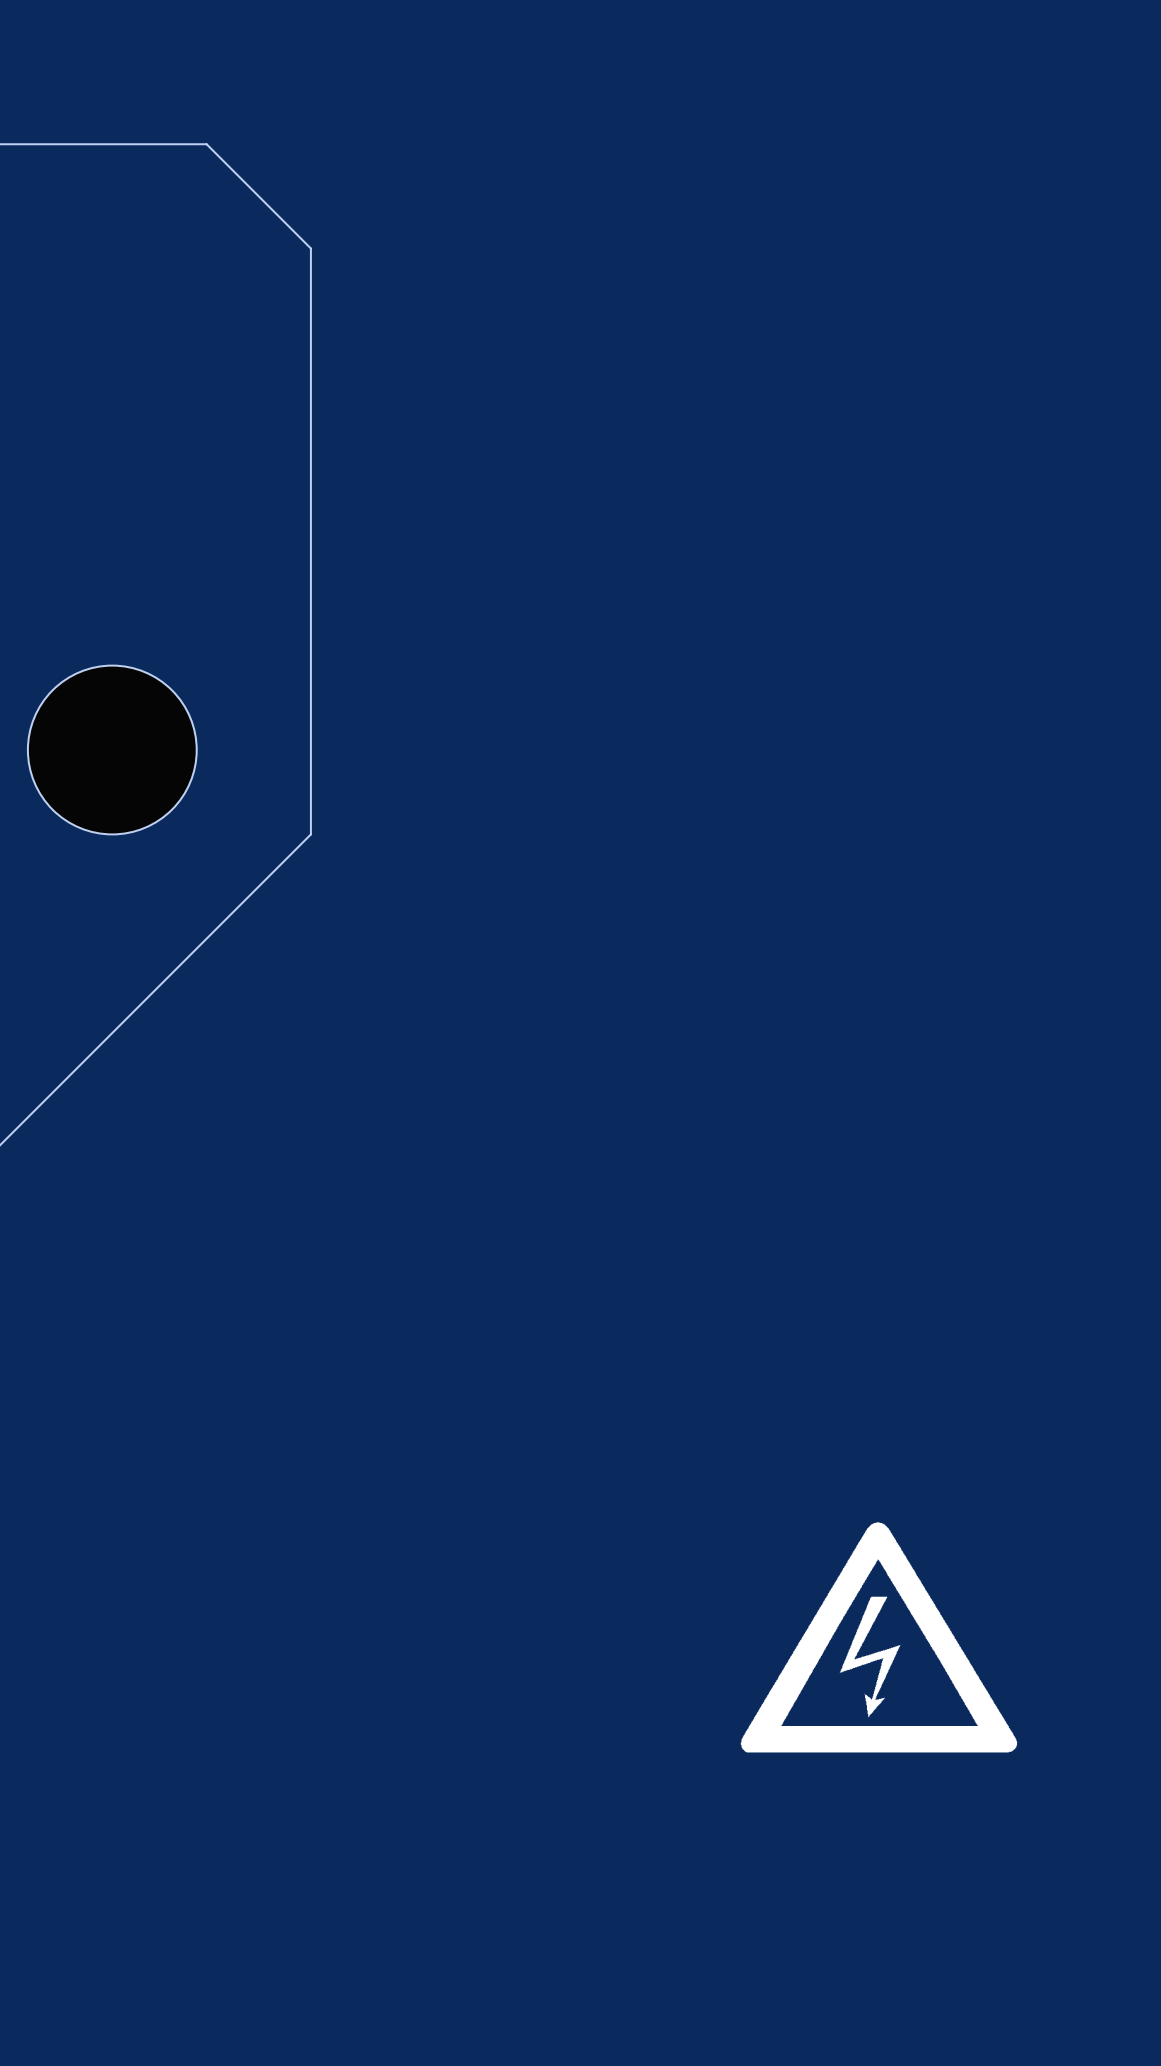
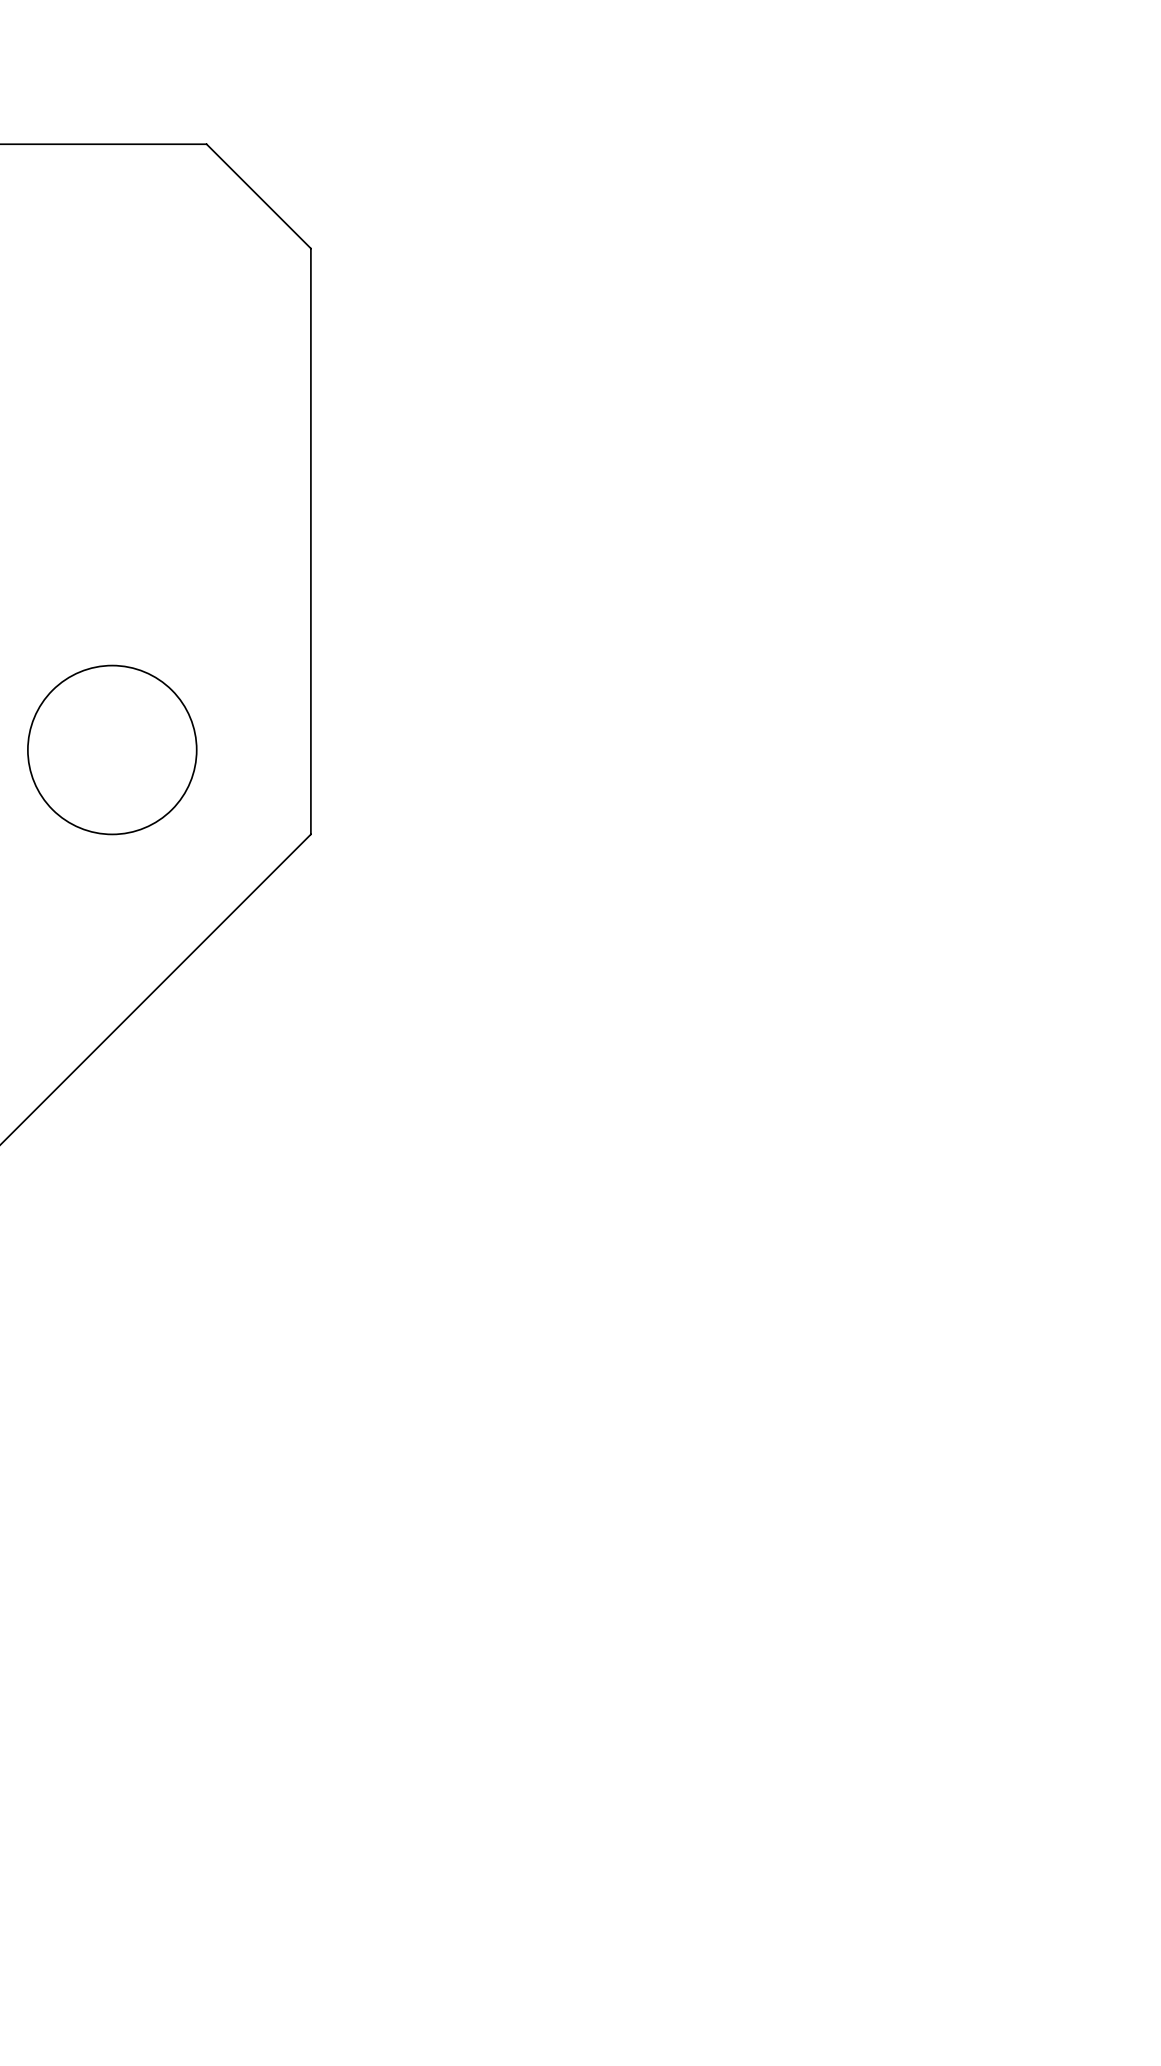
drawing: [740, 1522, 1018, 1753] -> none

